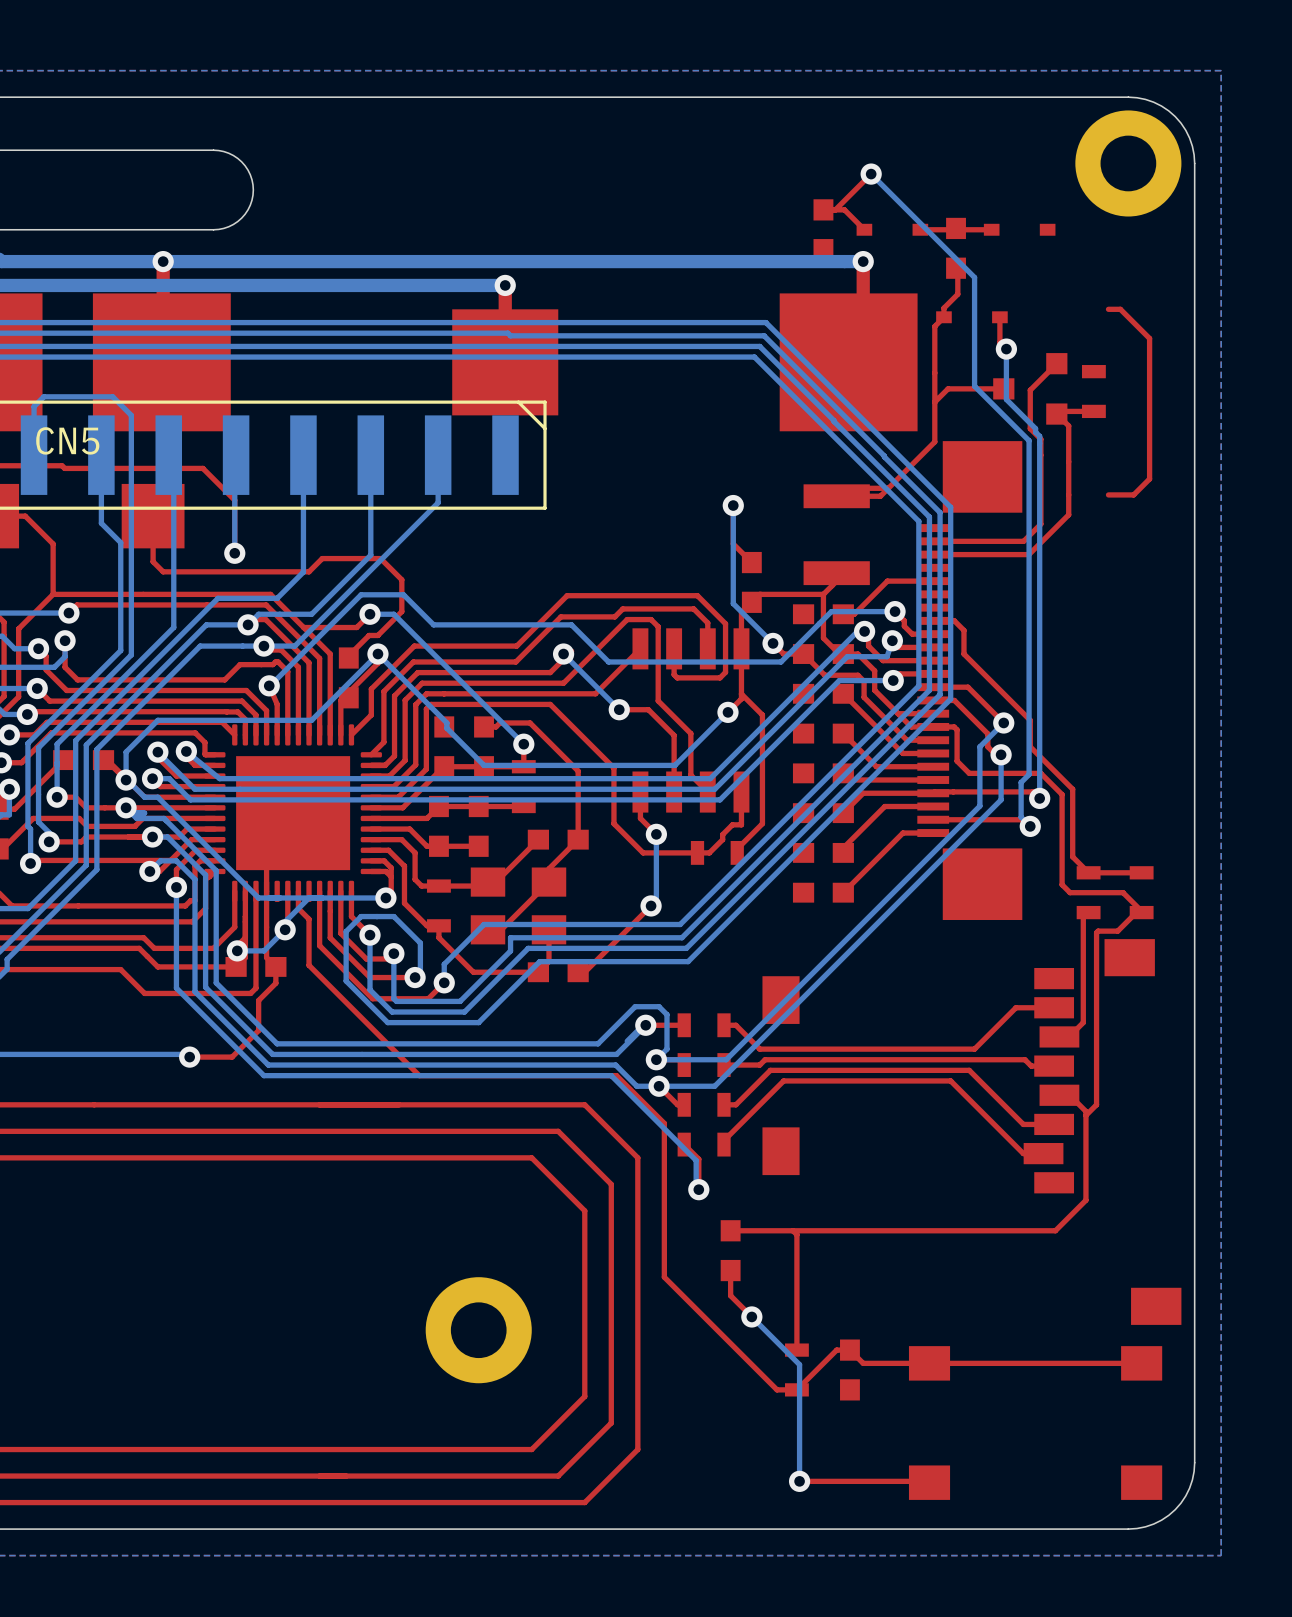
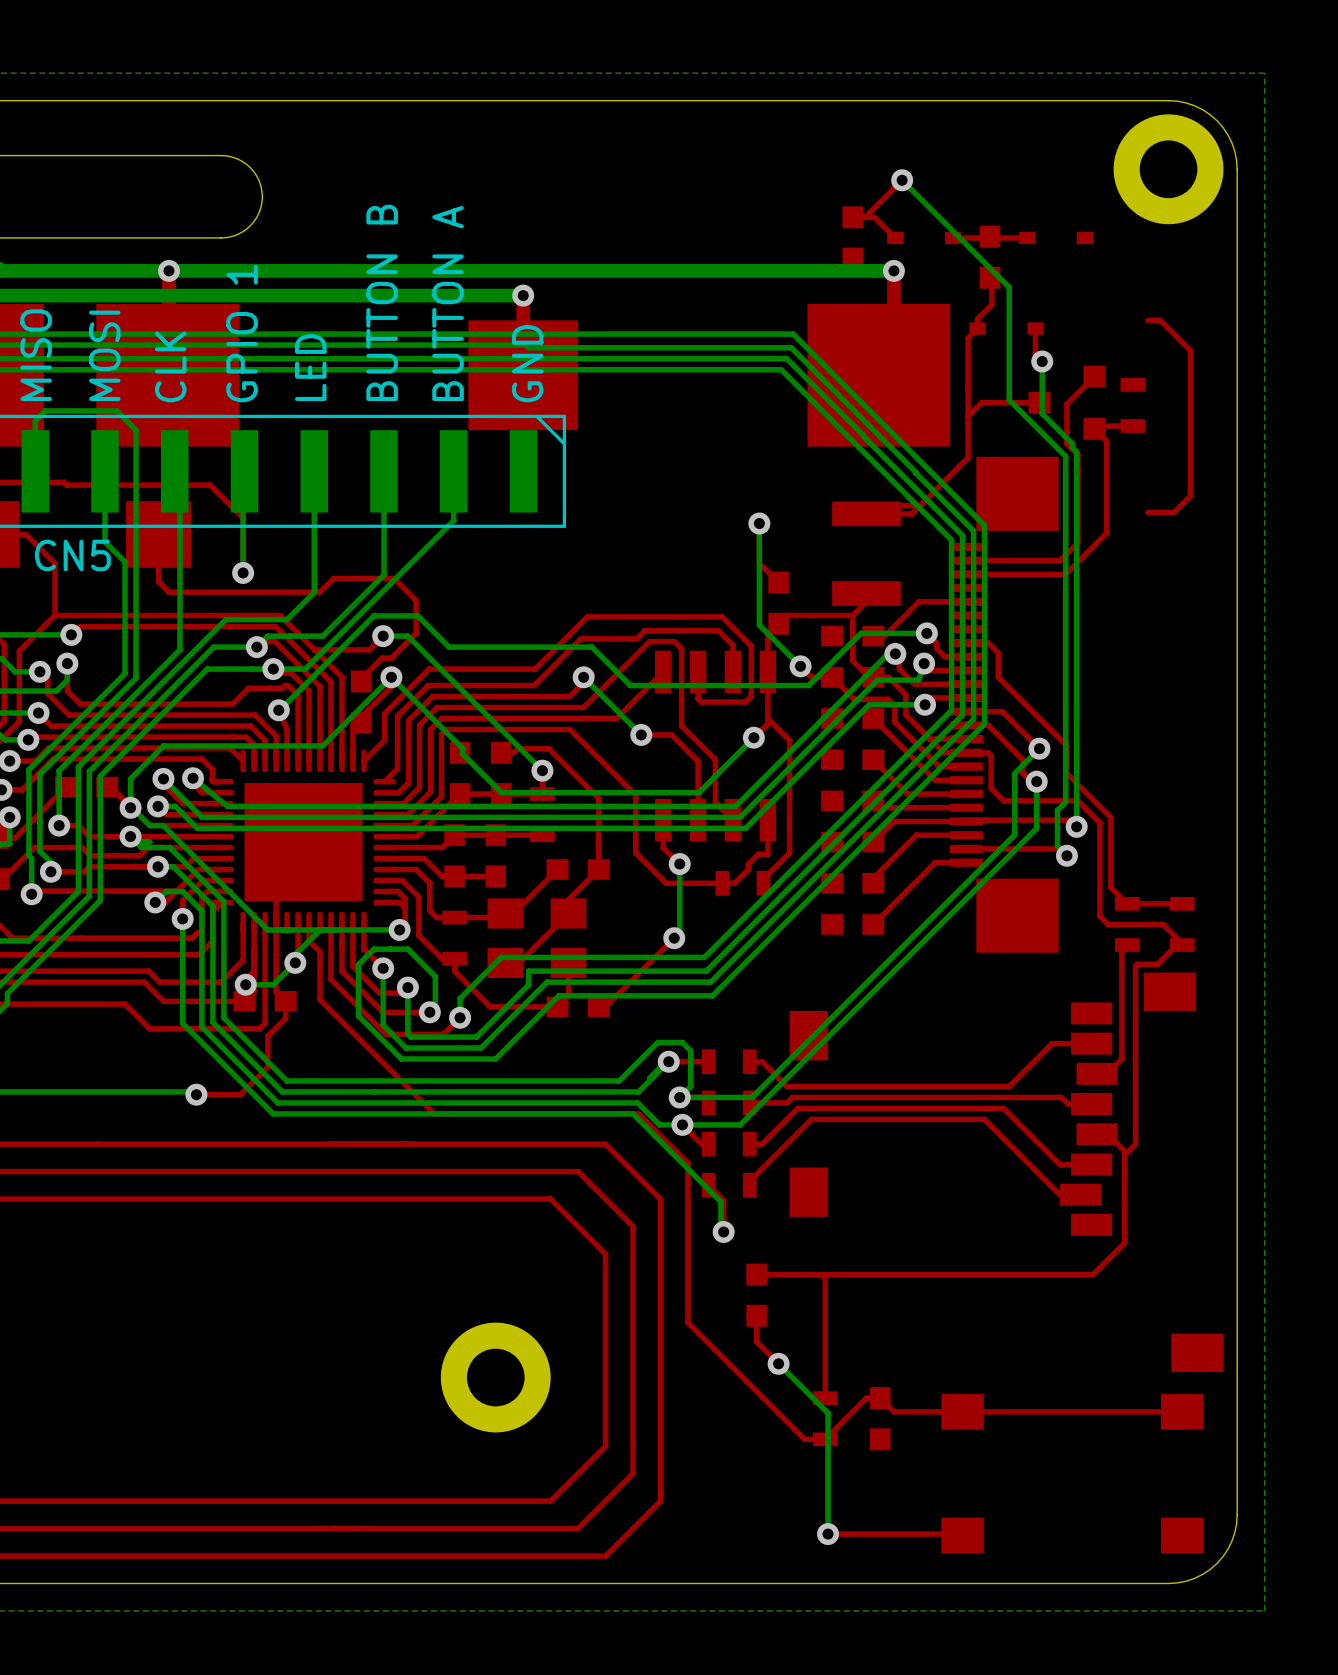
text: none -> BUTTON A (448, 303)
text: none -> BUTTON B (382, 302)
text: none -> GPIO 1 (242, 333)
text: none -> MISO (36, 355)
text: none -> MOSI (104, 355)
text: none -> LED (310, 367)
text: none -> CLK (170, 366)
text: none -> GND (527, 363)
CN5 name position: CN5 (67, 440) -> CN5 (72, 555)

